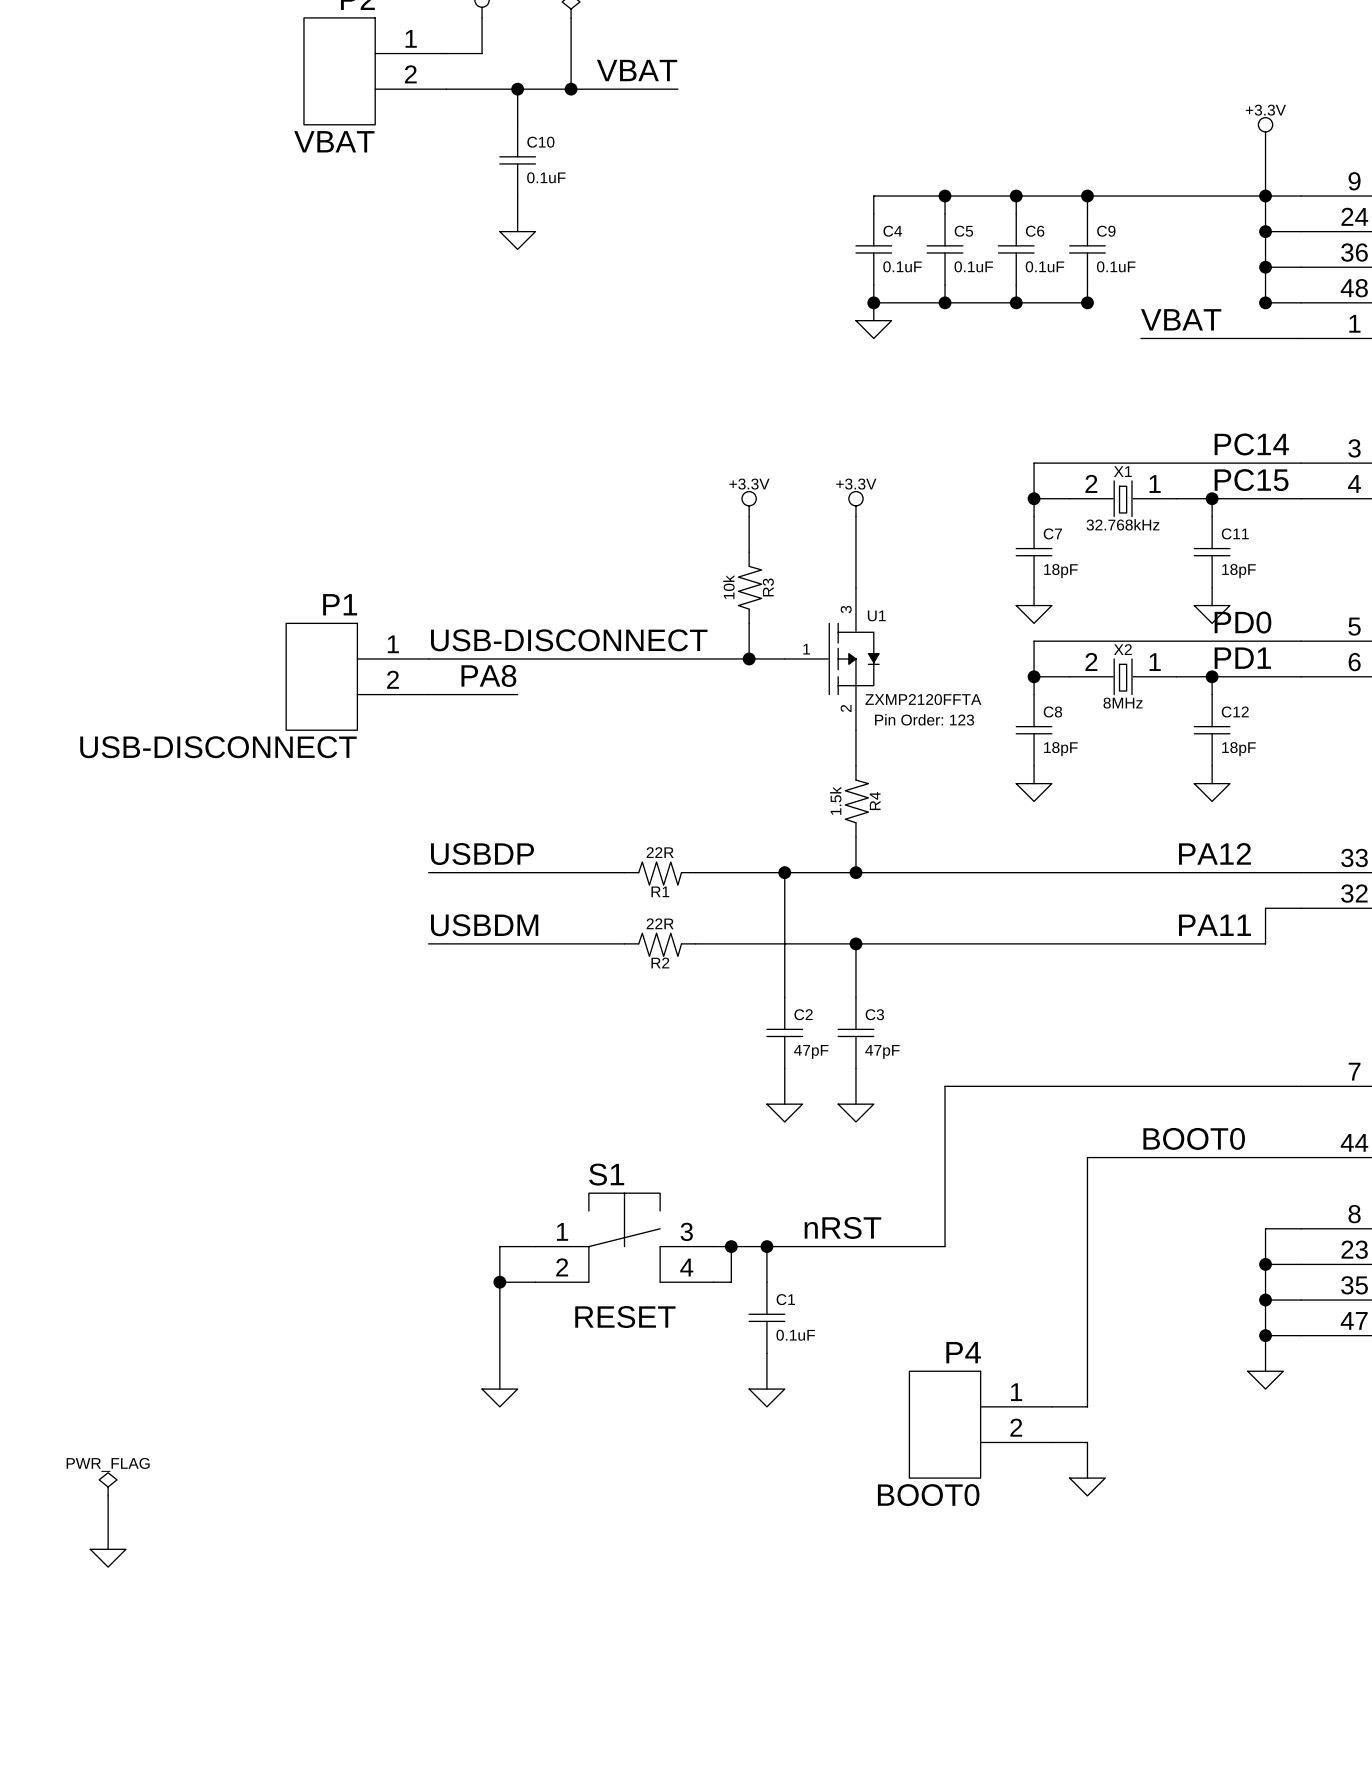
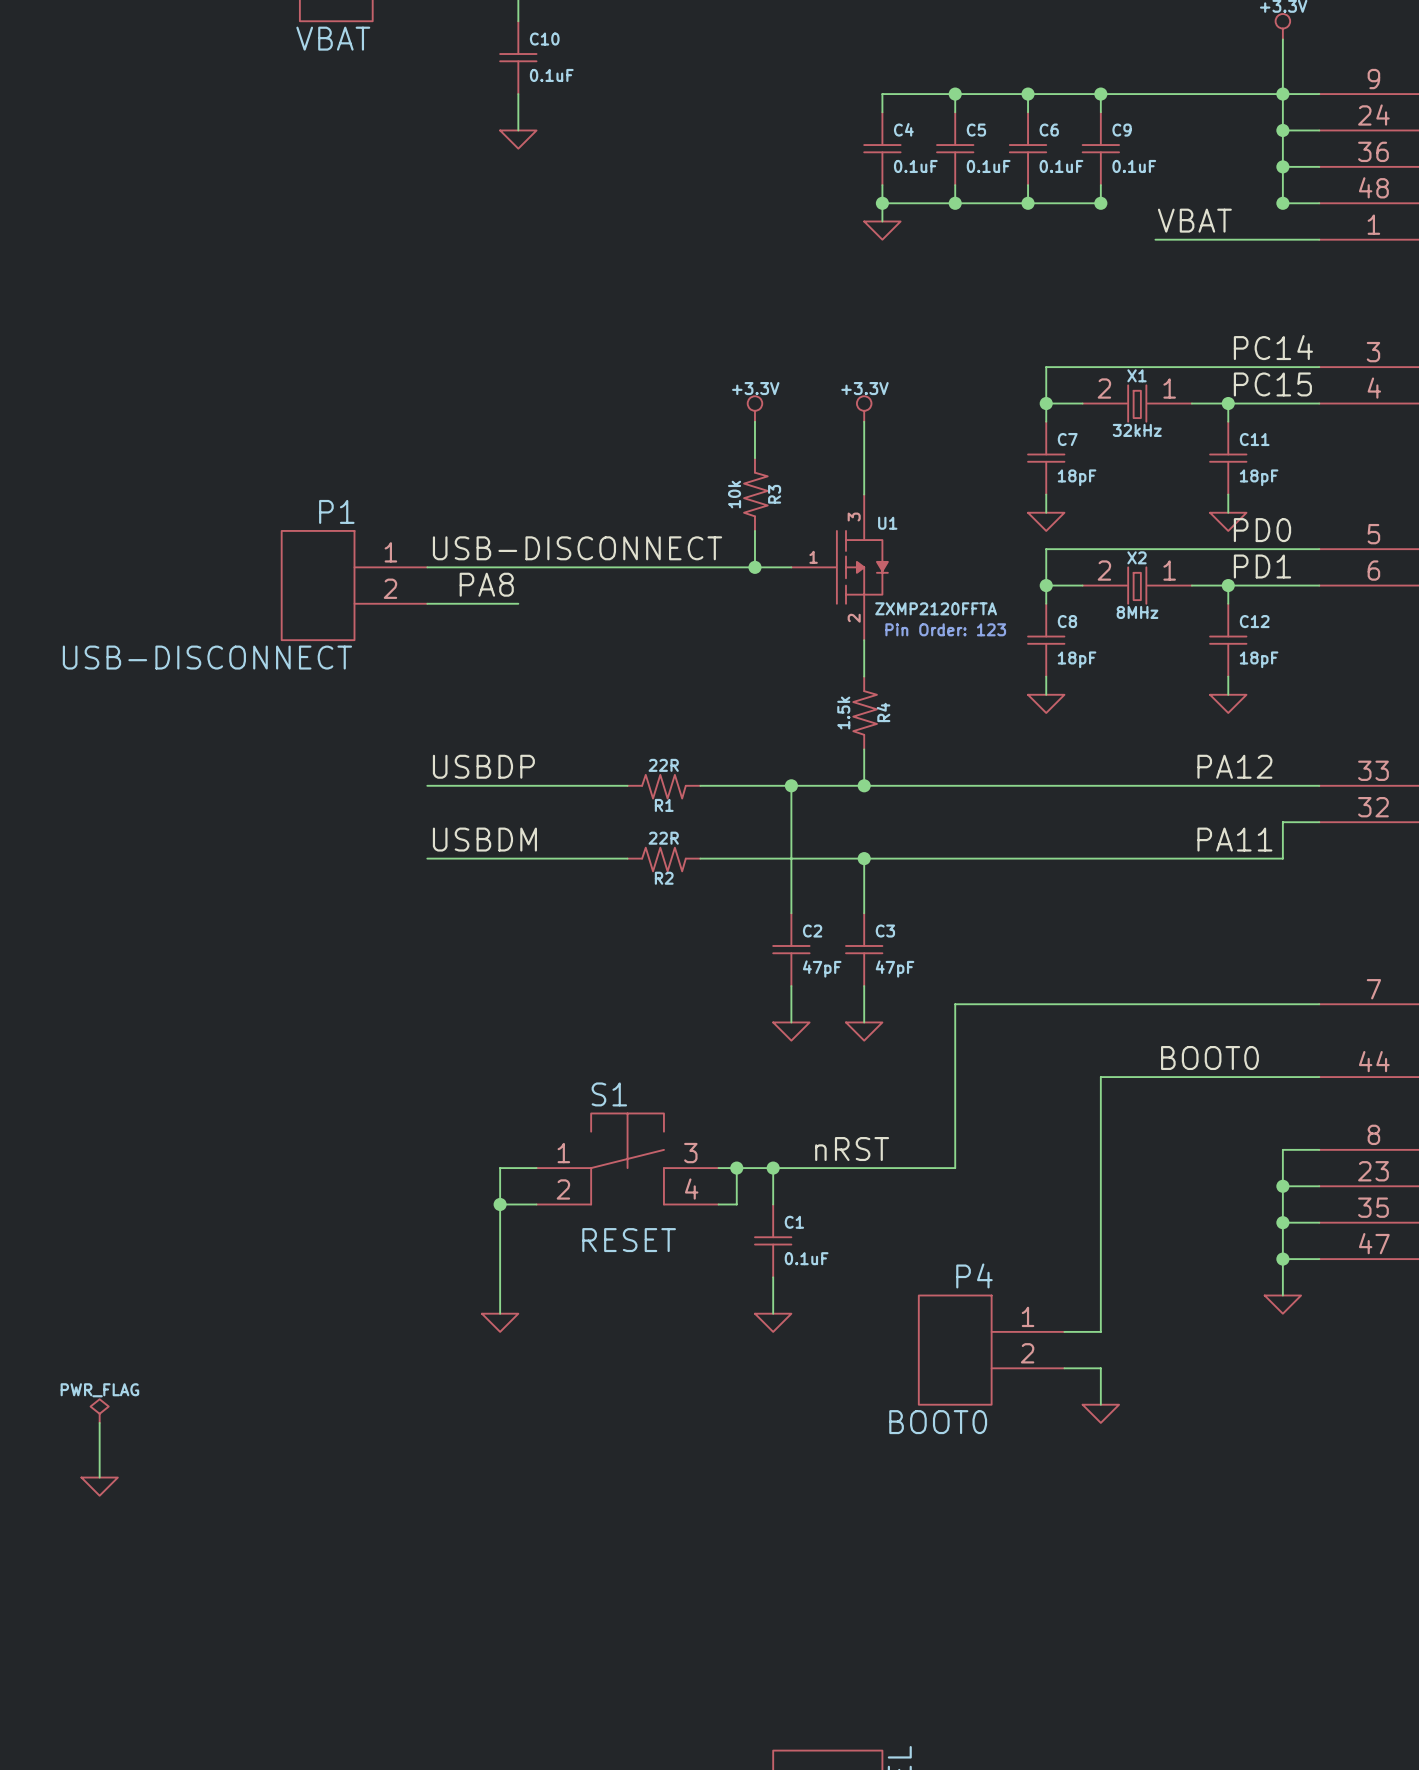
X1 value: 32.768kHz (1122, 524) -> 32kHz (1137, 430)

